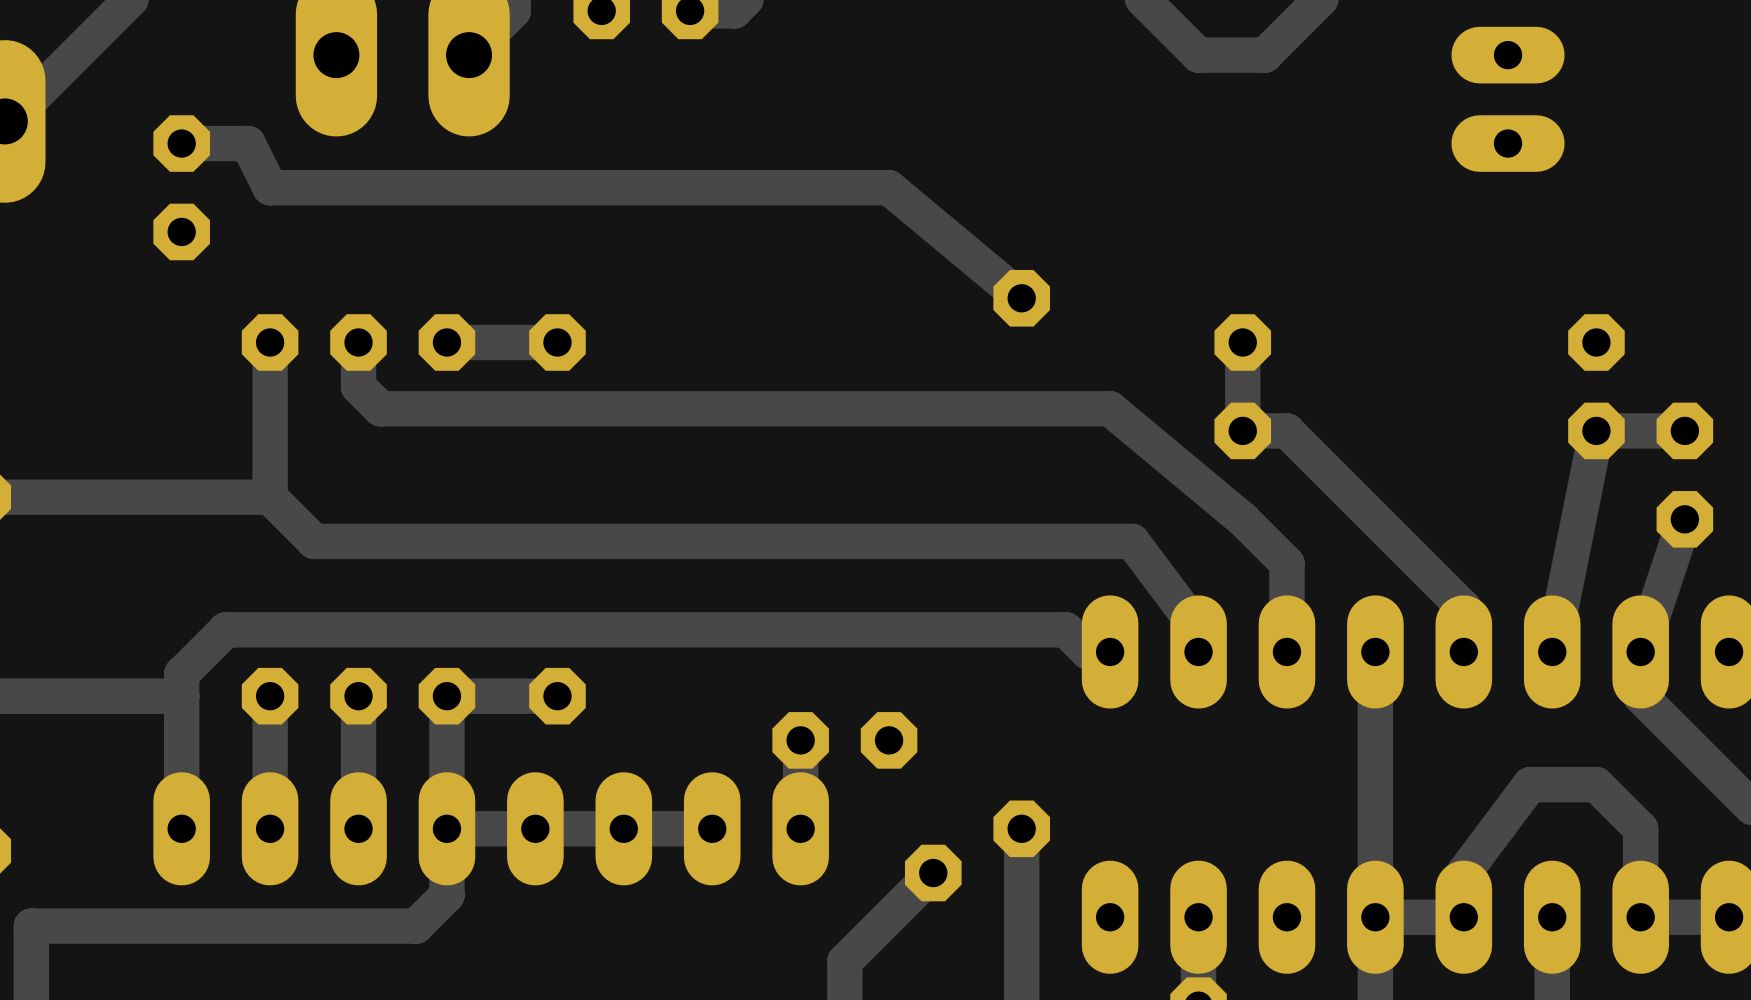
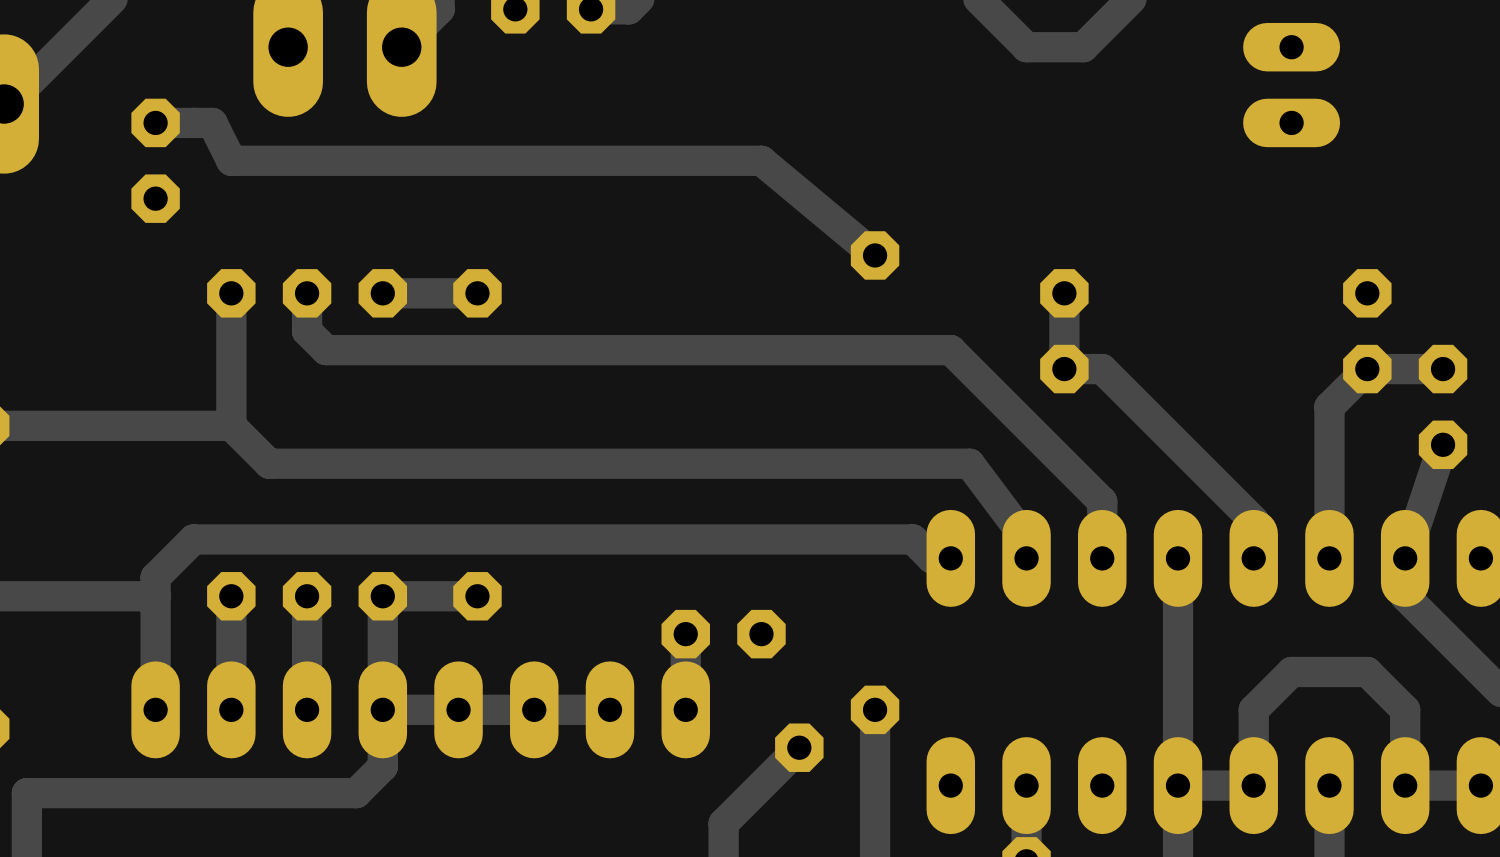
track: (1110, 408) (1242, 519) (1286, 563) (1286, 585) -> (950, 350) (1102, 501)
track: (1596, 430) (1552, 651) -> (1367, 369) (1329, 406) (1329, 558)
track: (1530, 784) (1463, 873) -> (1310, 671) (1291, 671) (1253, 709) (1253, 747)

